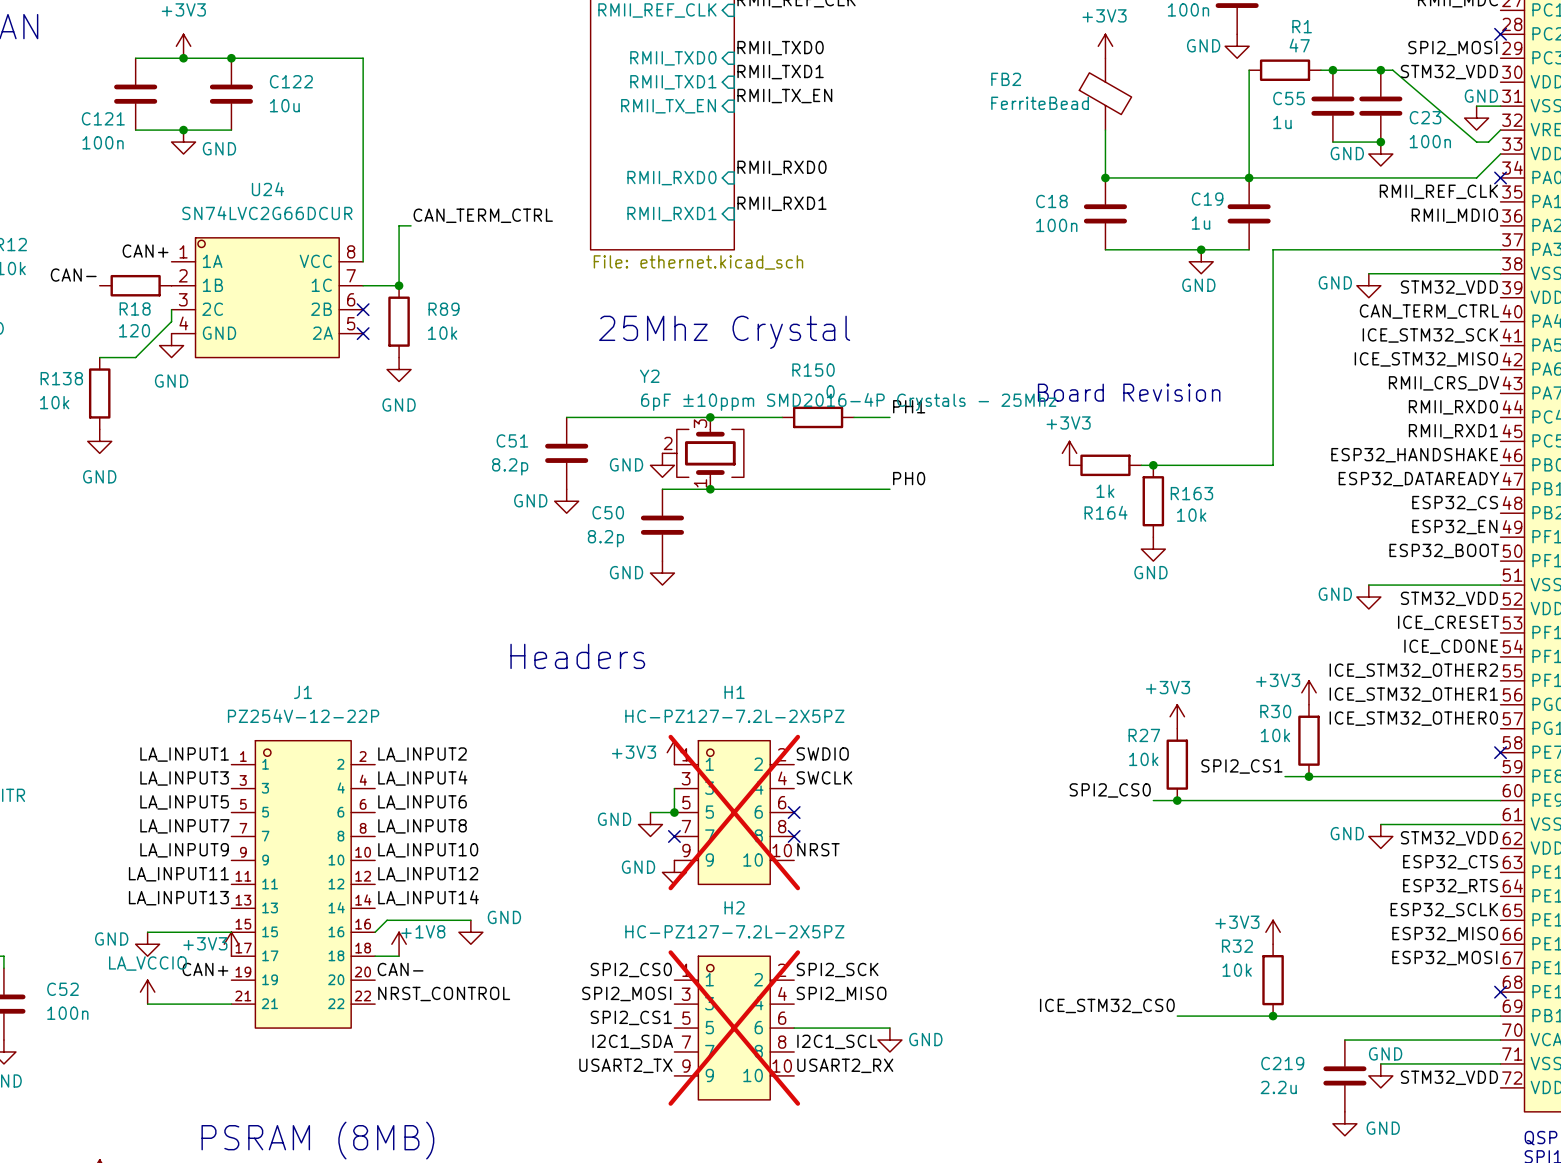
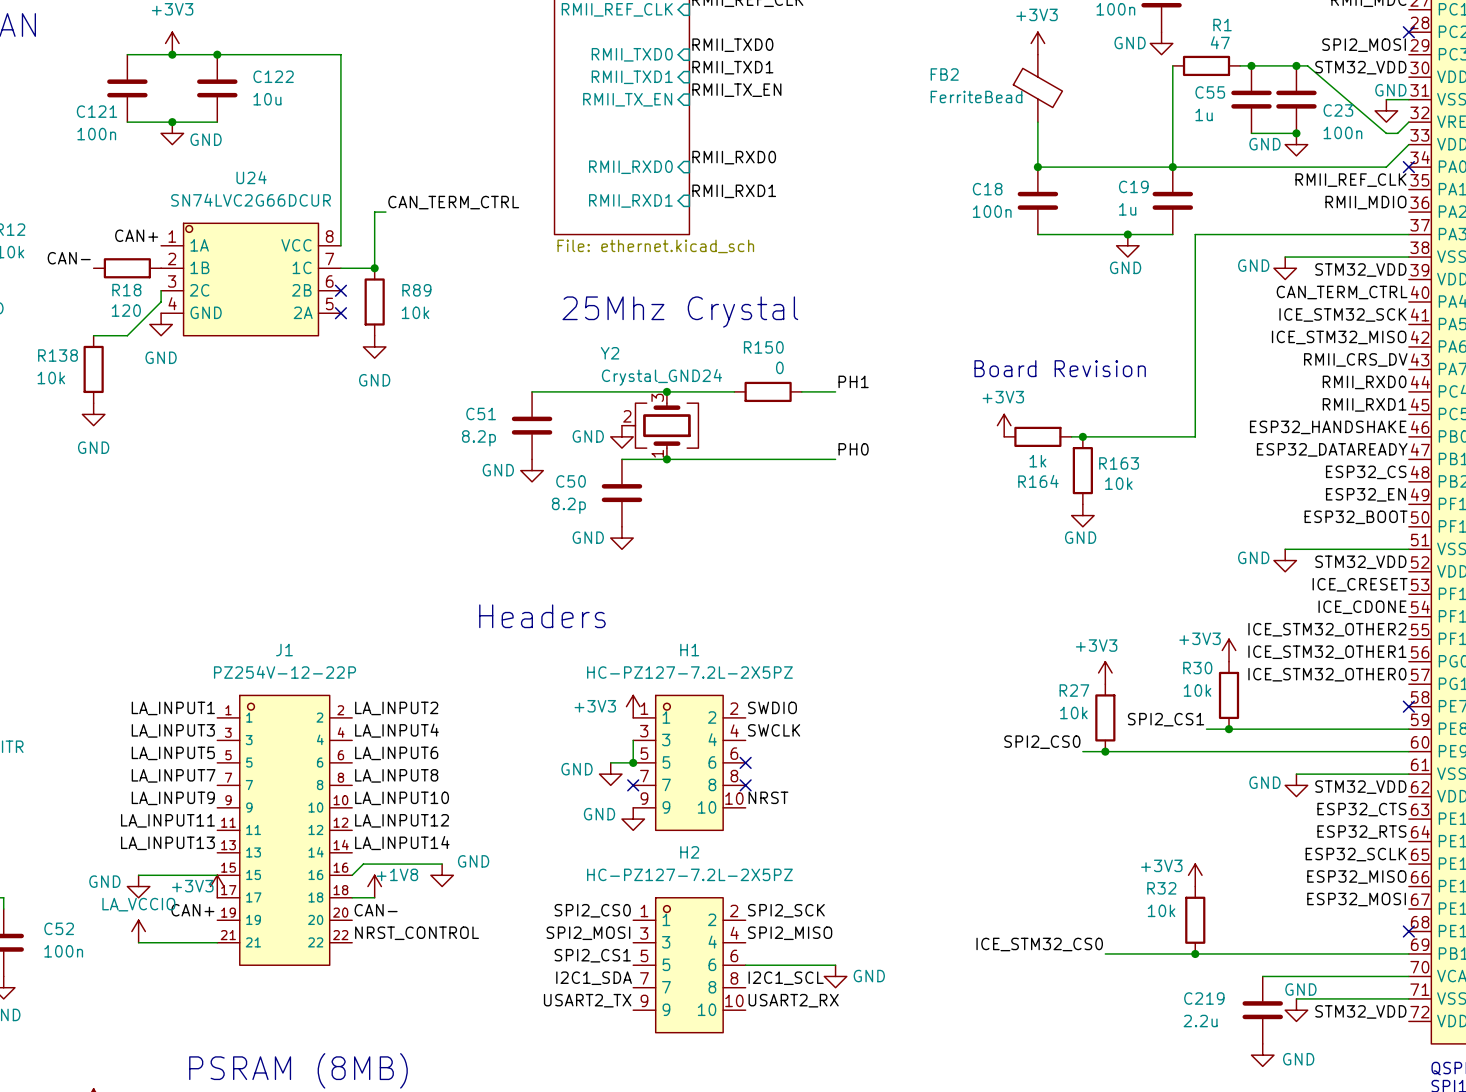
Y2 value: 6pF ±10ppm SMD2016-4P Crystals - 25Mhz (848, 401) -> Crystal_GND24 (661, 377)
H1 do-not-place cross: (734, 812) -> none
H2 do-not-place cross: (734, 1028) -> none

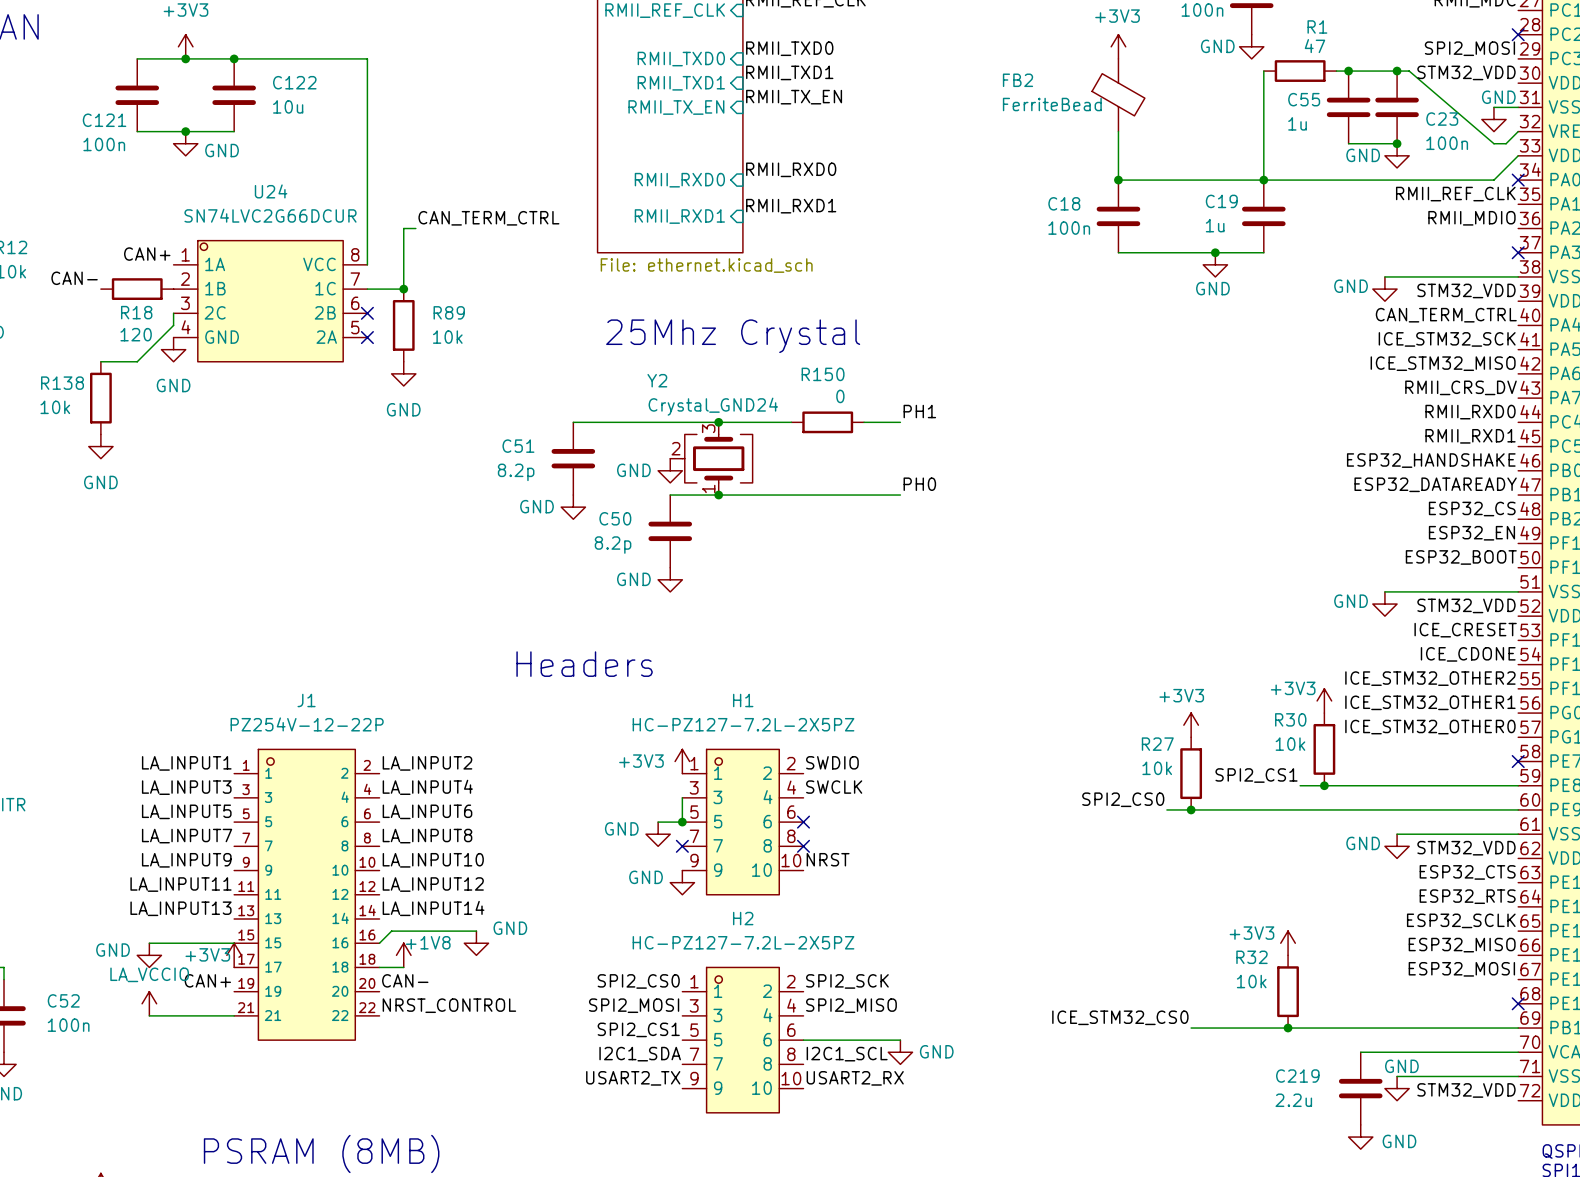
wire: (1408, 234) (1195, 234) (1195, 436) (1071, 436) -> none
no-connect mark: none -> (1518, 252)
text: Board Revision (1060, 368) -> none
power symbol: +3V3 (1004, 425) -> none
R164: 1k (1037, 436) -> none
junction: (1082, 436) -> none
R163: 10k (1082, 470) -> none
power symbol: GND (1082, 515) -> none

